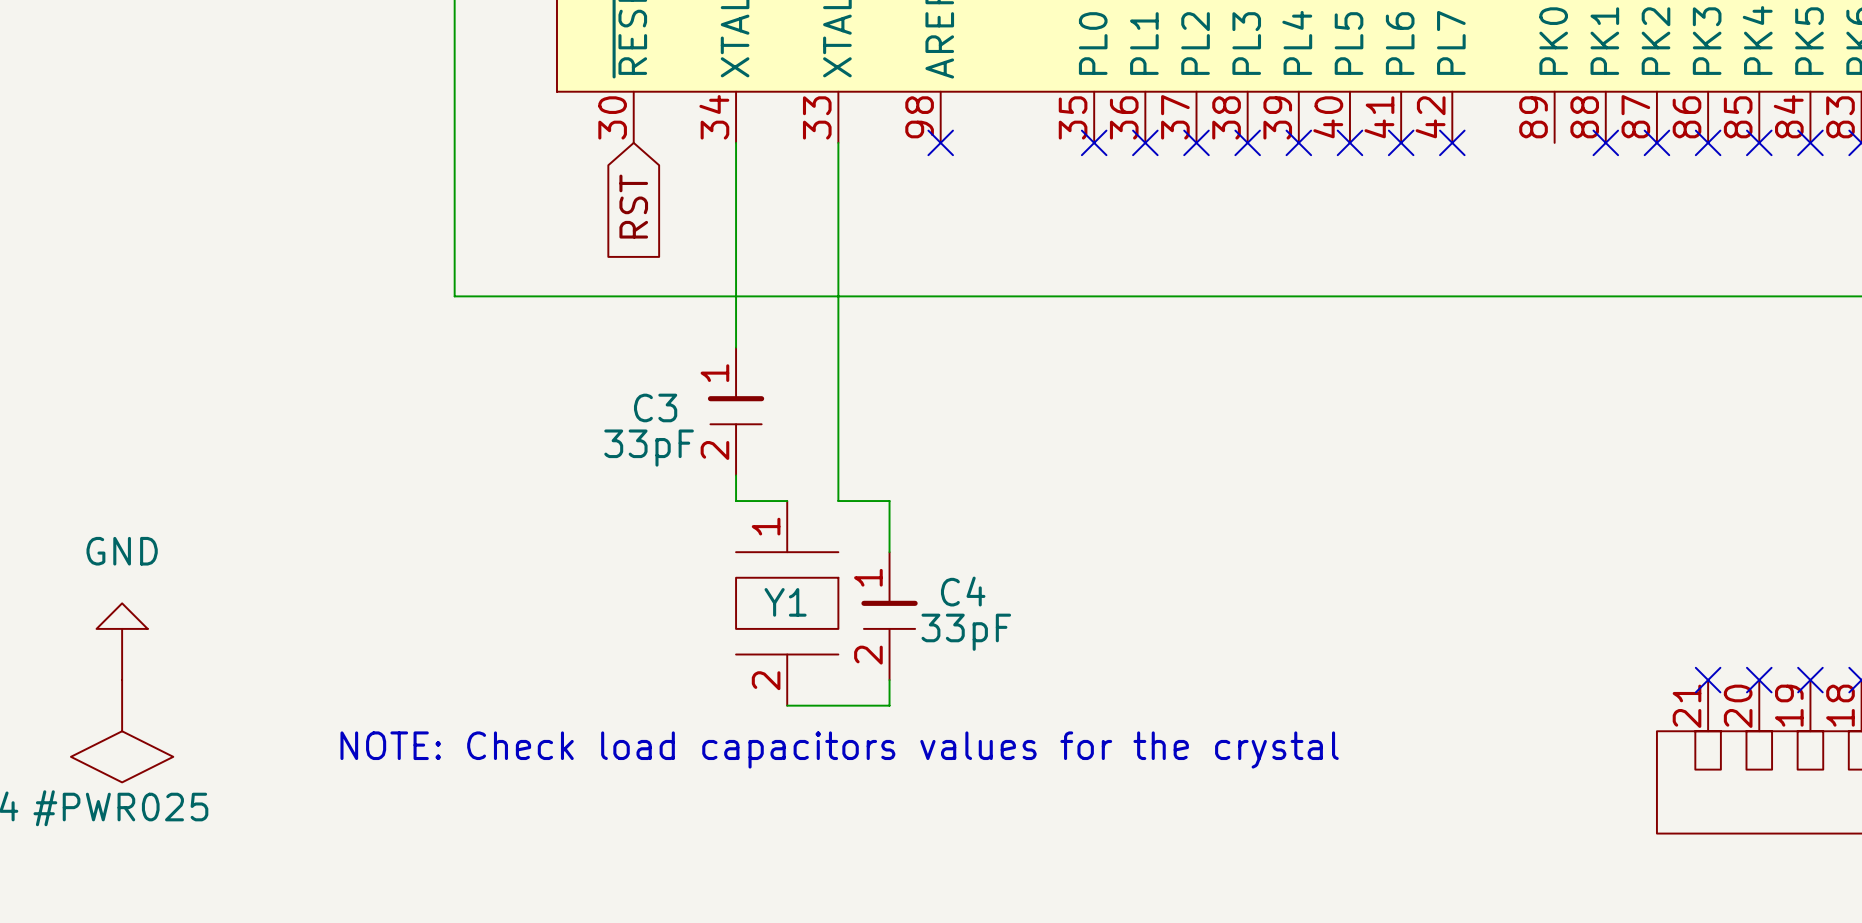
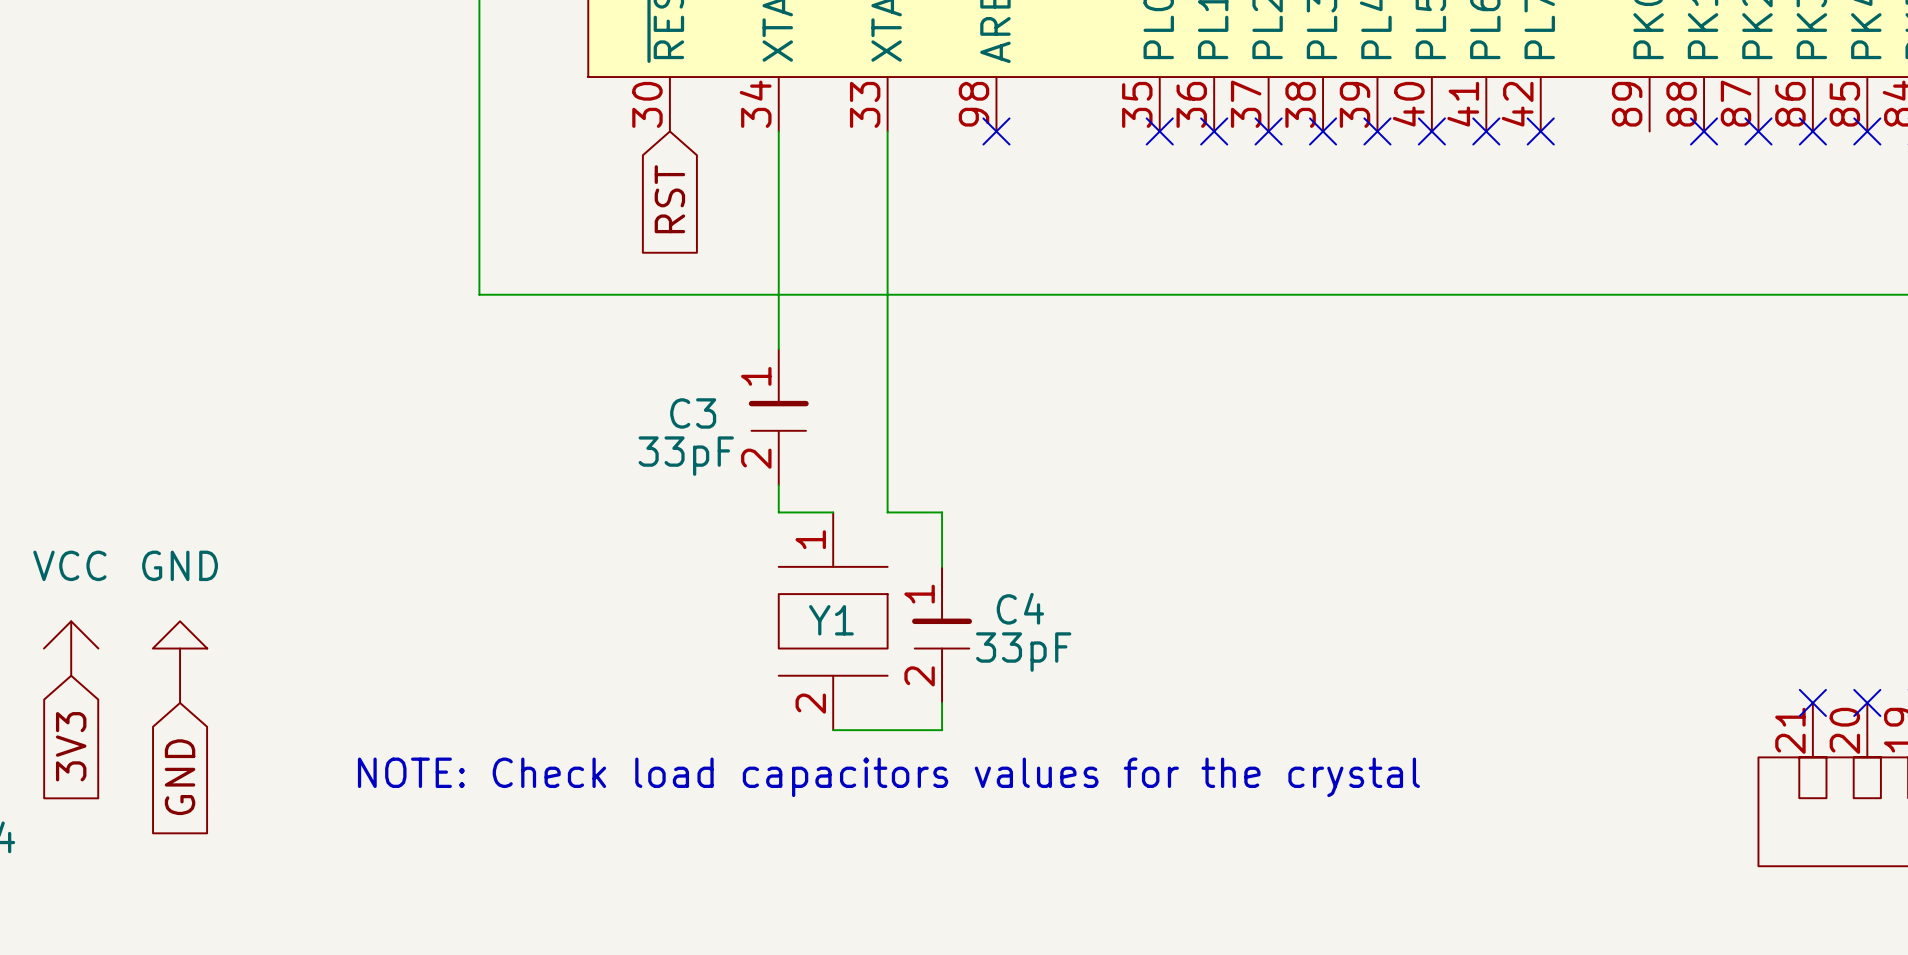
power symbol: none -> VCC (71, 648)
power symbol position: GND (122, 641) -> GND (180, 662)
global label: none -> 3V3 (71, 746)
#PWR025: (122, 731) -> none
global label: none -> GND (180, 777)

